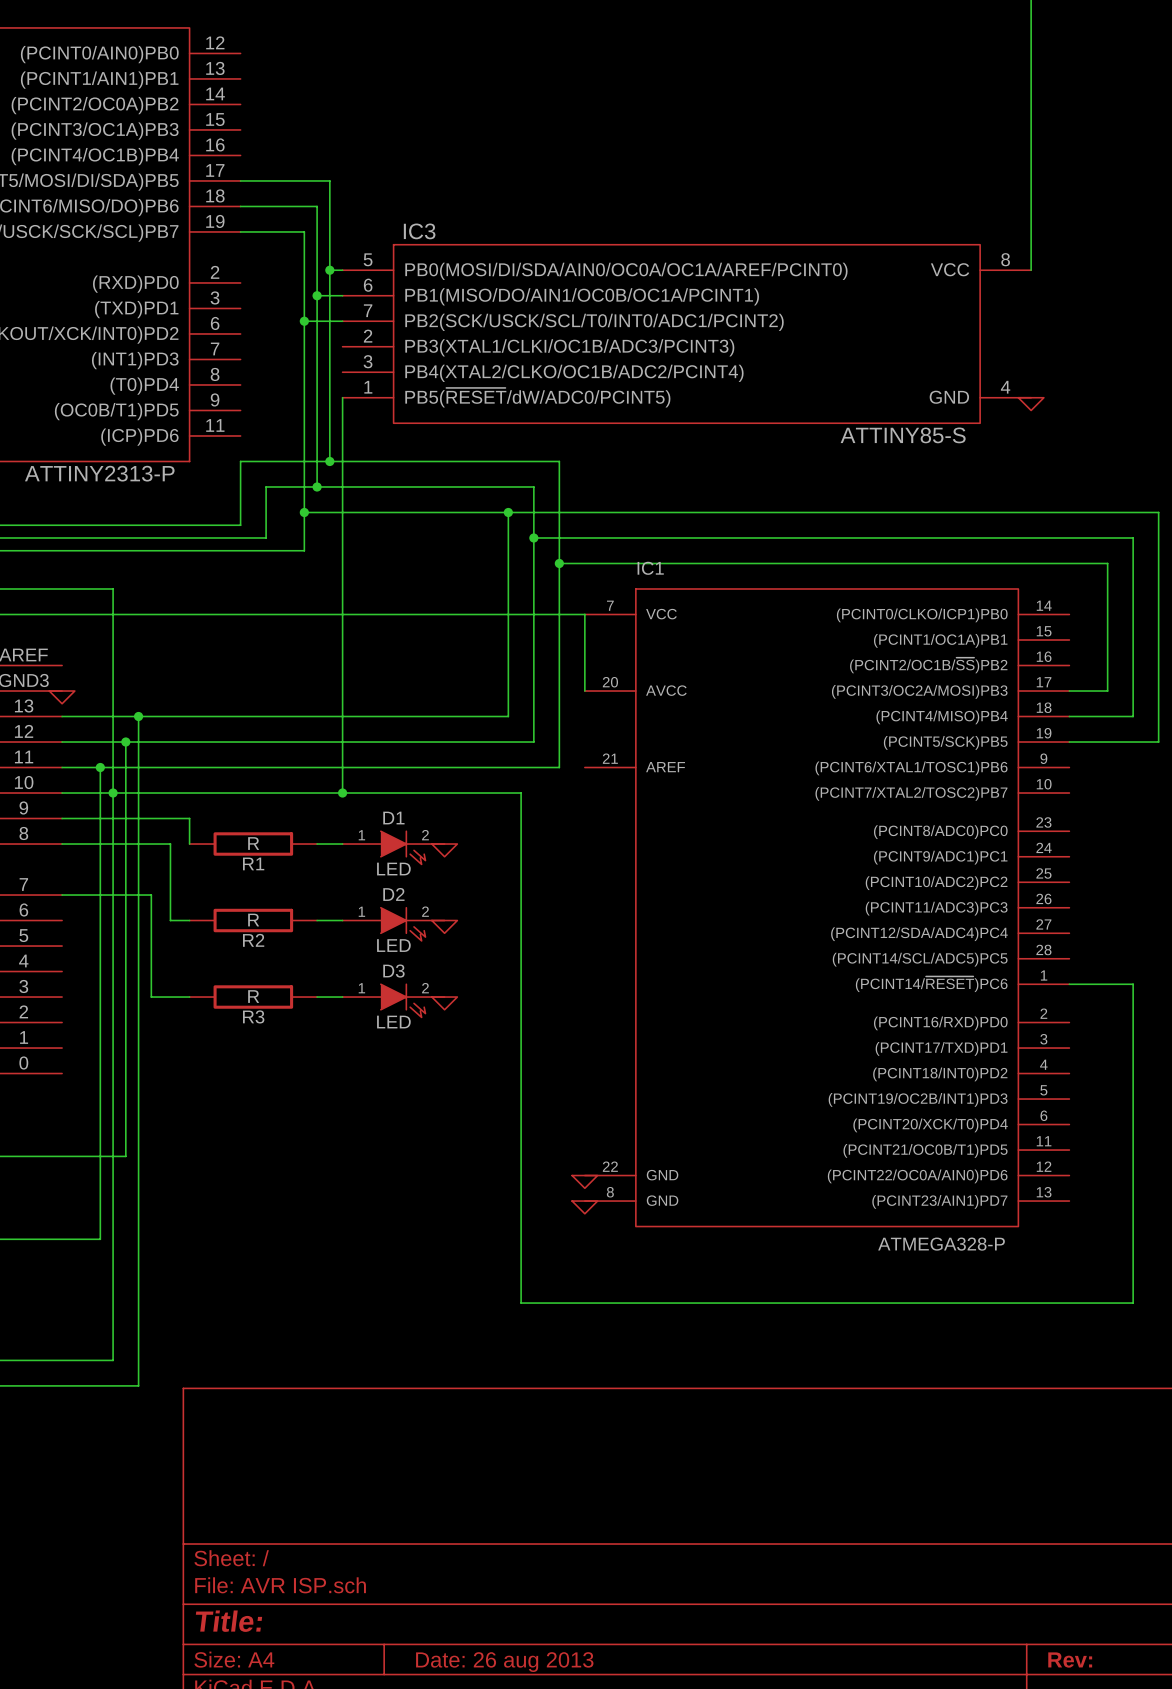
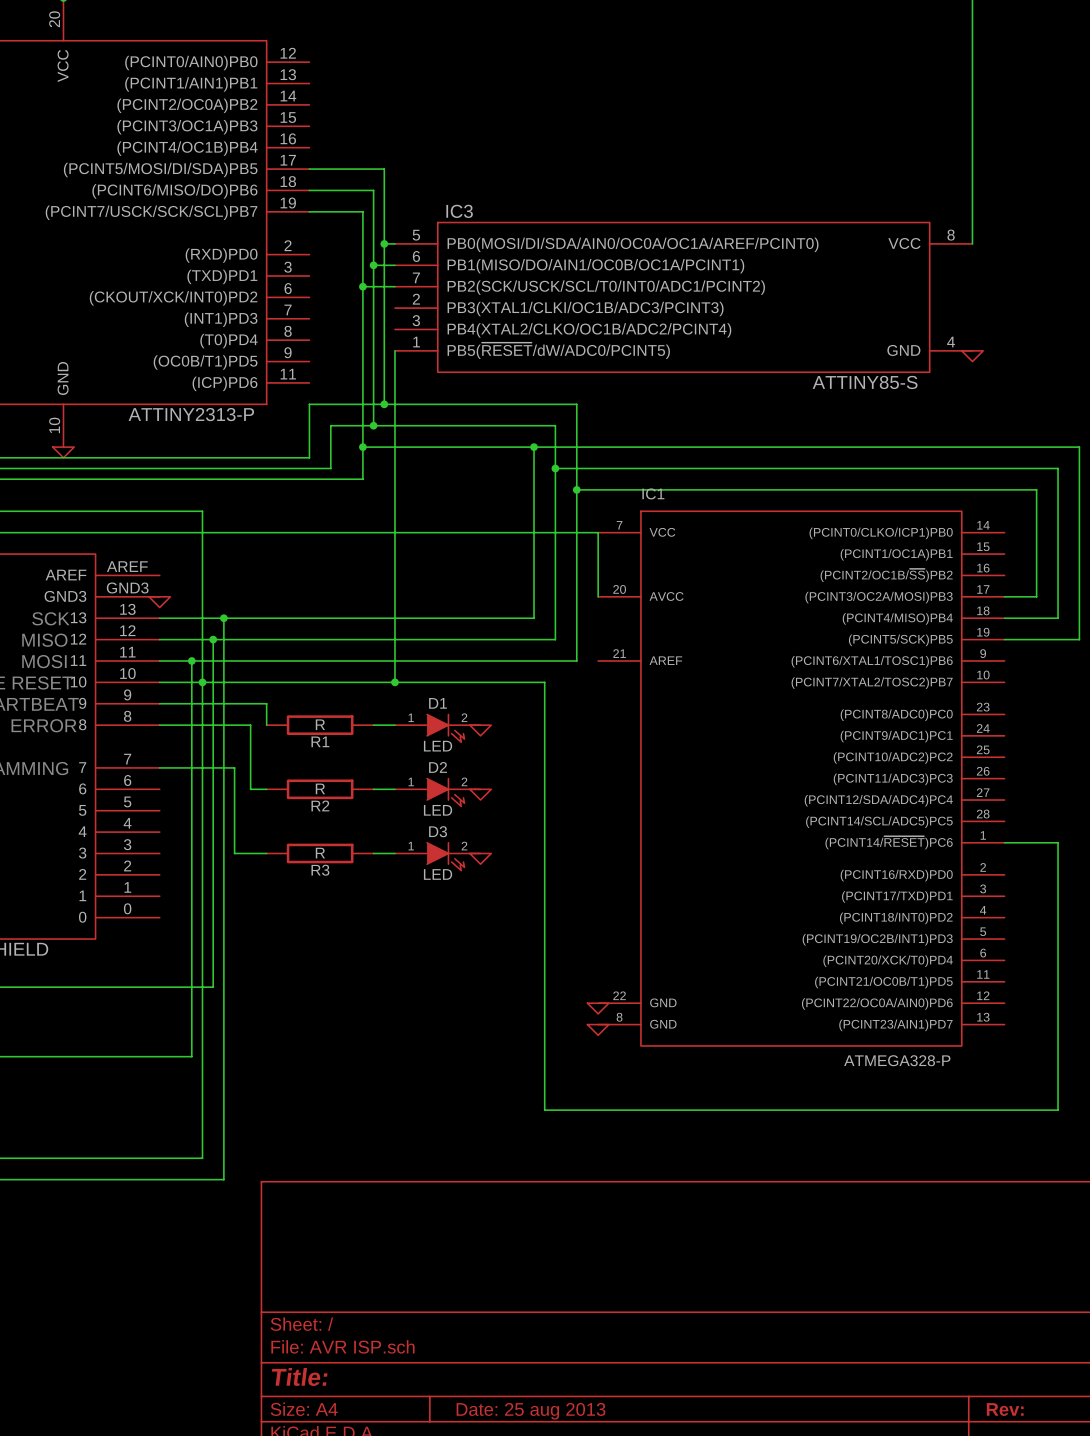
title block: Date: 26 aug 2013 (504, 1662) -> Date: 25 aug 2013 (531, 1411)

